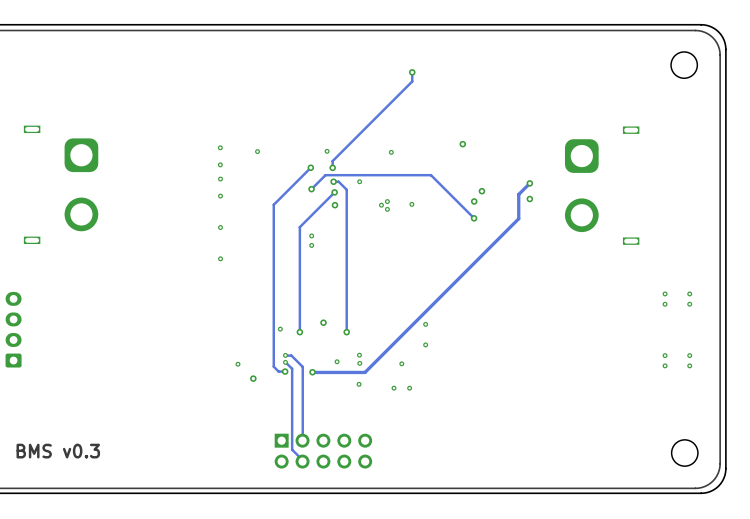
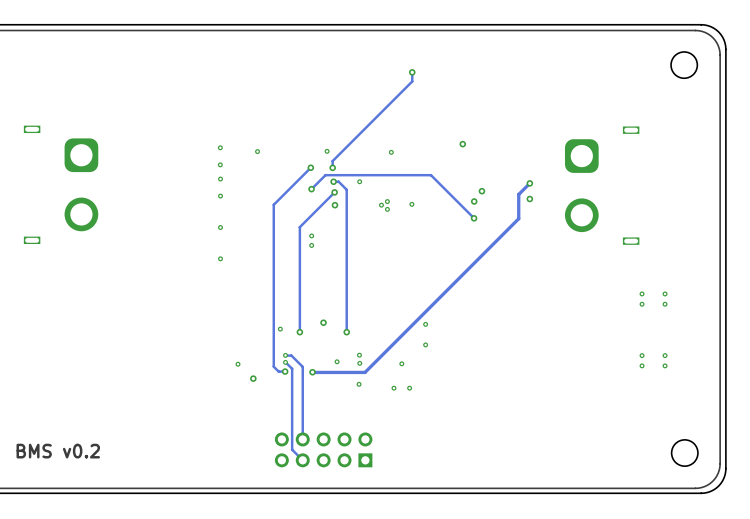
via: none -> (642, 293)
via: (689, 293) -> none
via: none -> (642, 304)
via: (689, 304) -> none
part: (13, 329) -> none
via: none -> (642, 355)
via: (689, 355) -> none
via: none -> (642, 365)
via: (689, 365) -> none
text: BMS v0.3 (58, 451) -> BMS v0.2 (58, 451)
part rotation: 0° (323, 451) -> 180° (323, 449)

